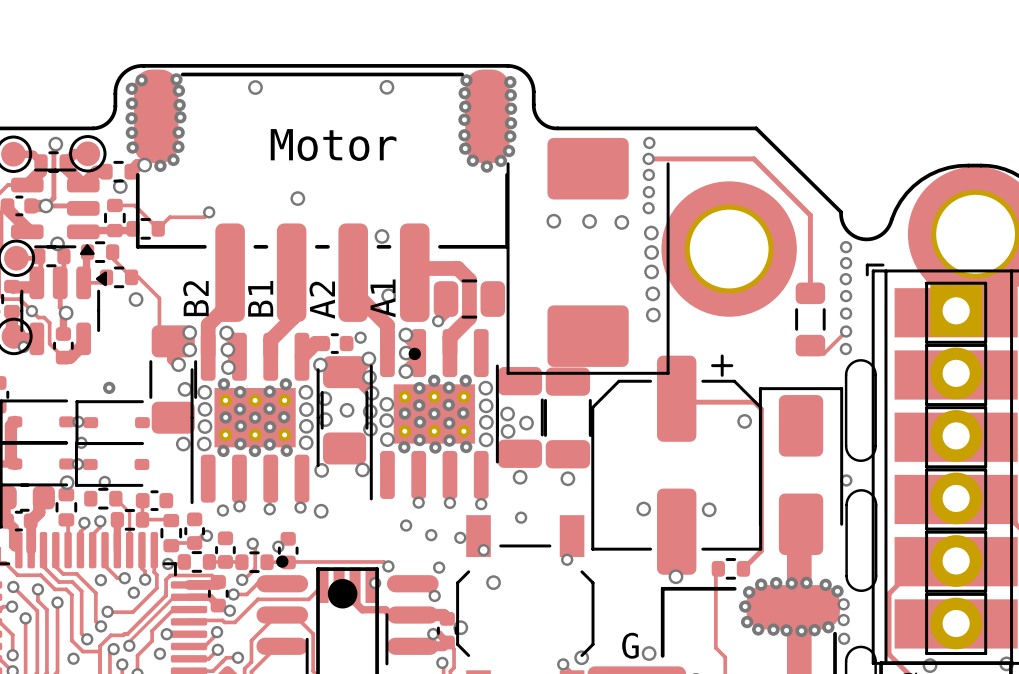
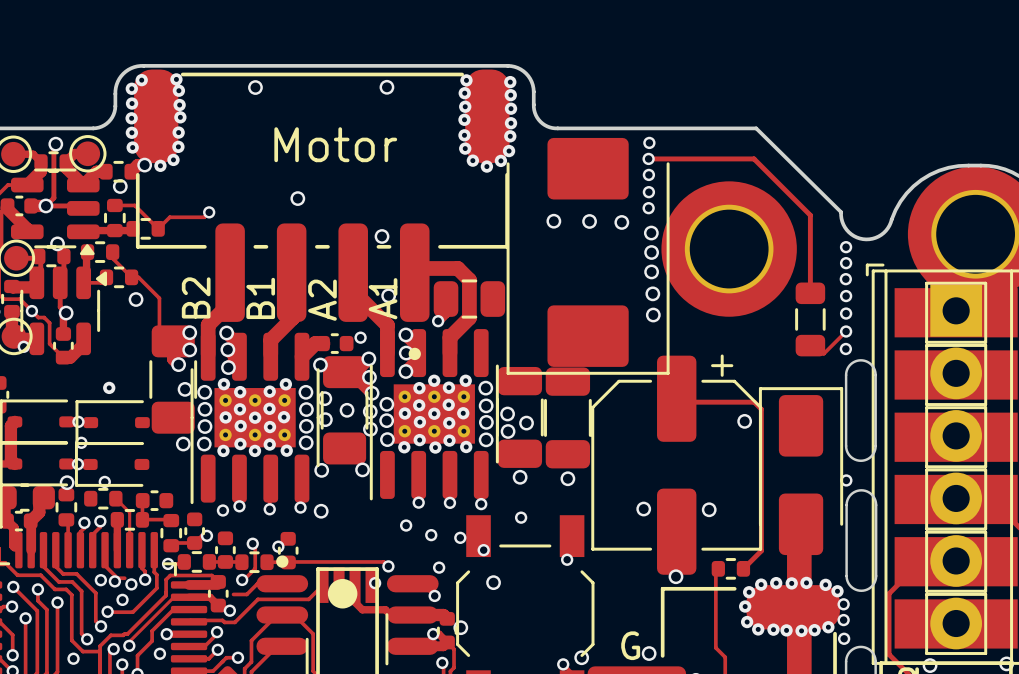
via: (124, 578) -> none
via: none -> (114, 581)
via: none -> (131, 584)
via: (133, 592) -> none
via: (233, 594) -> none
via: none -> (122, 599)

